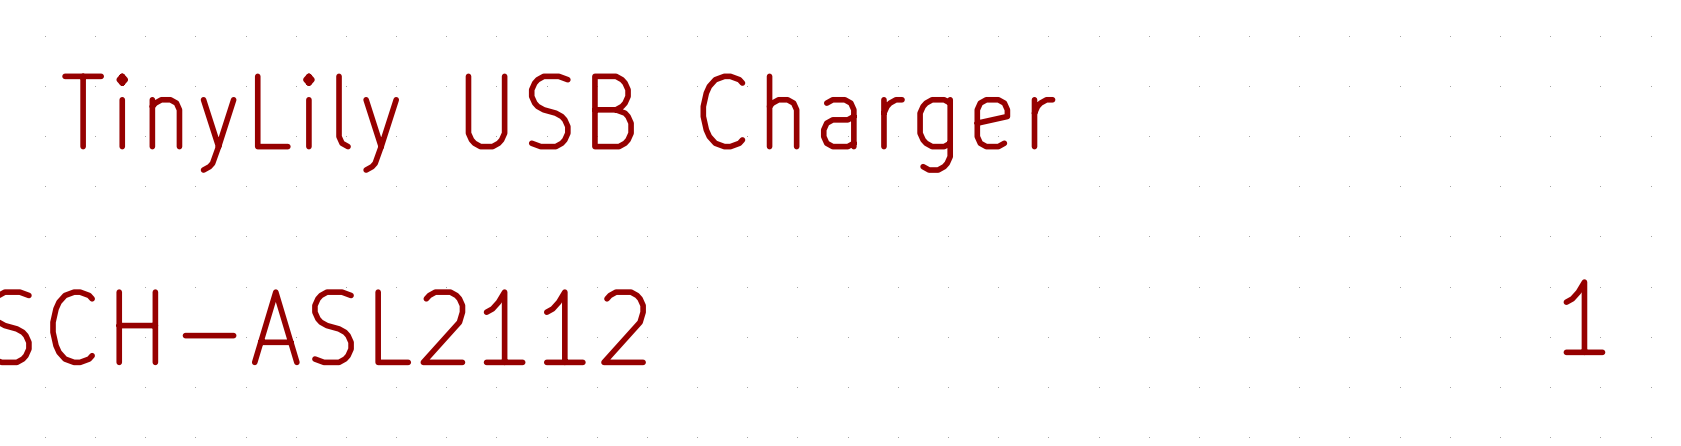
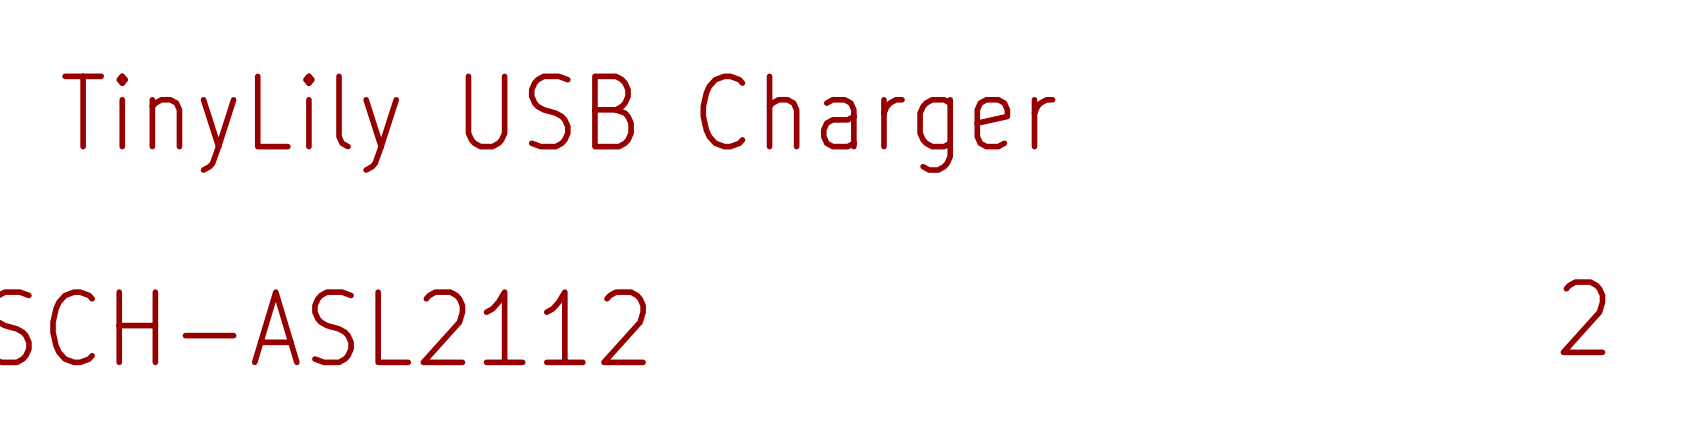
text: 1 (1584, 317) -> 2 (1582, 317)

